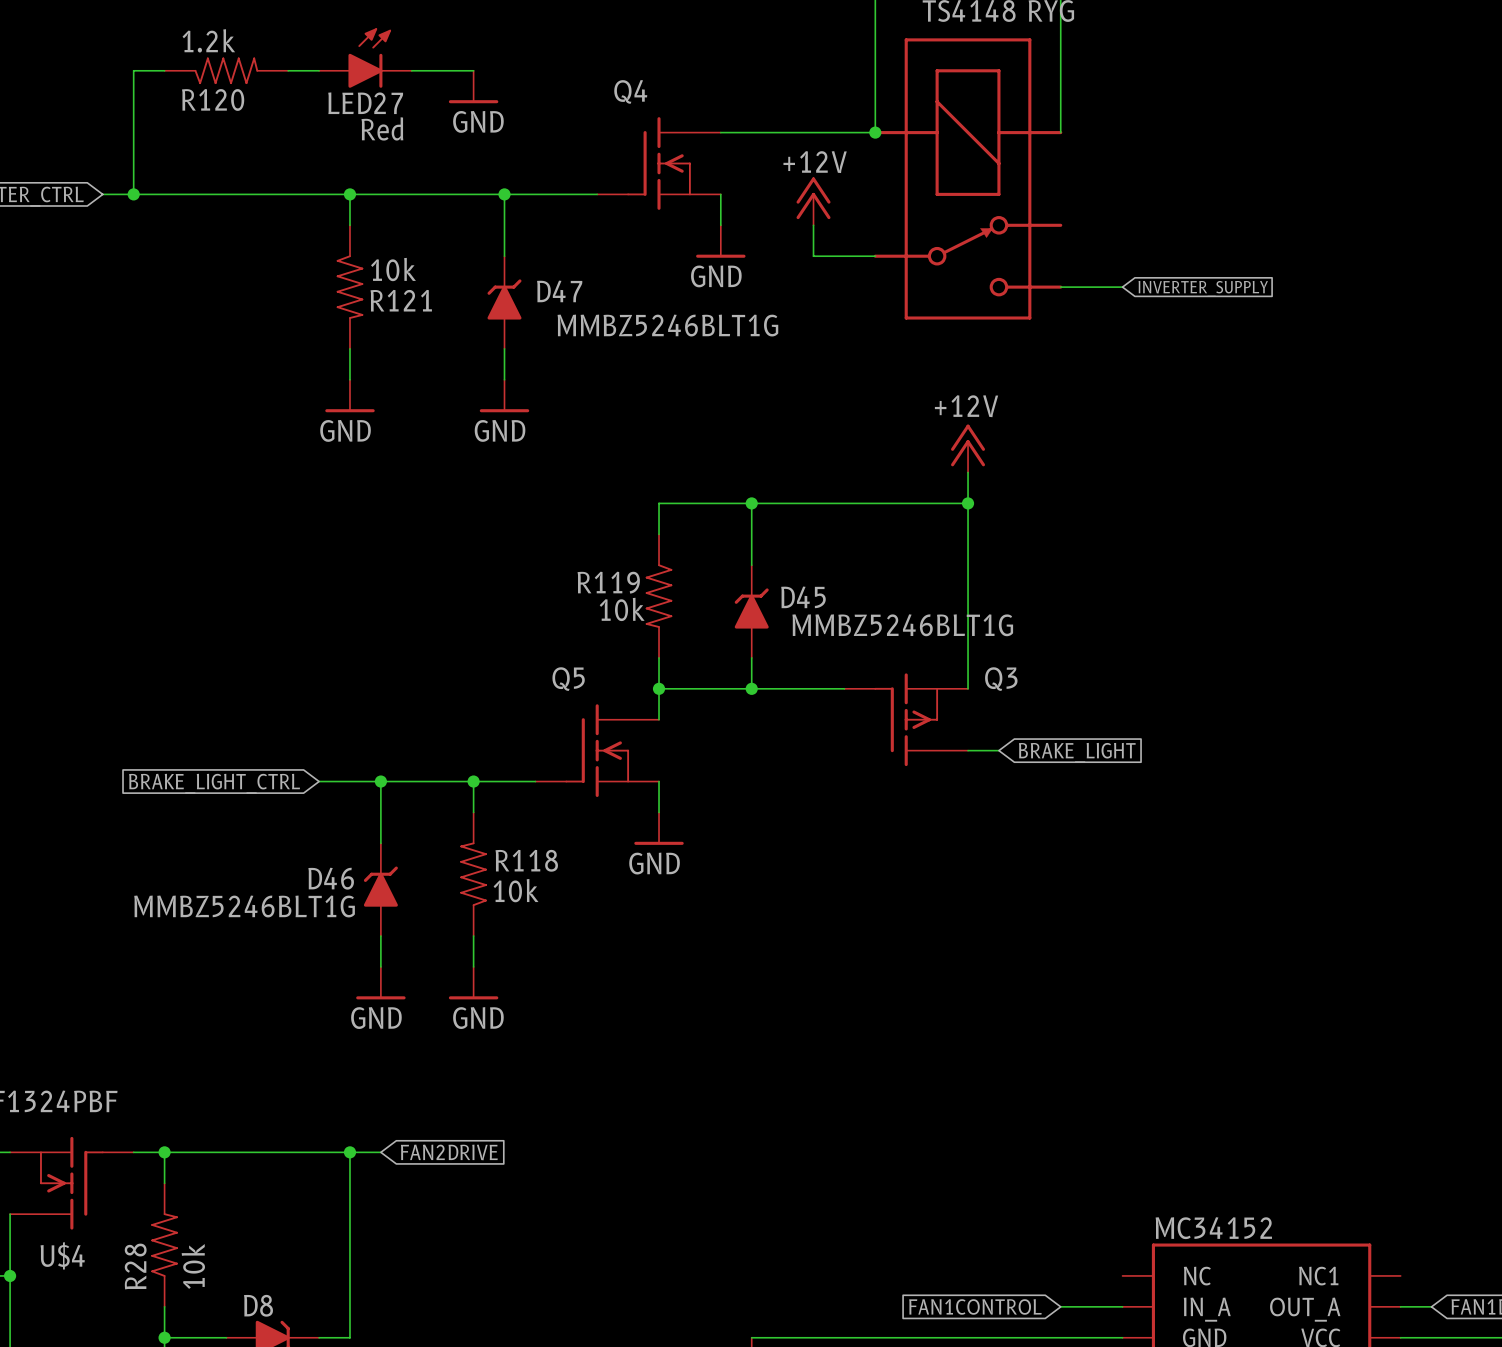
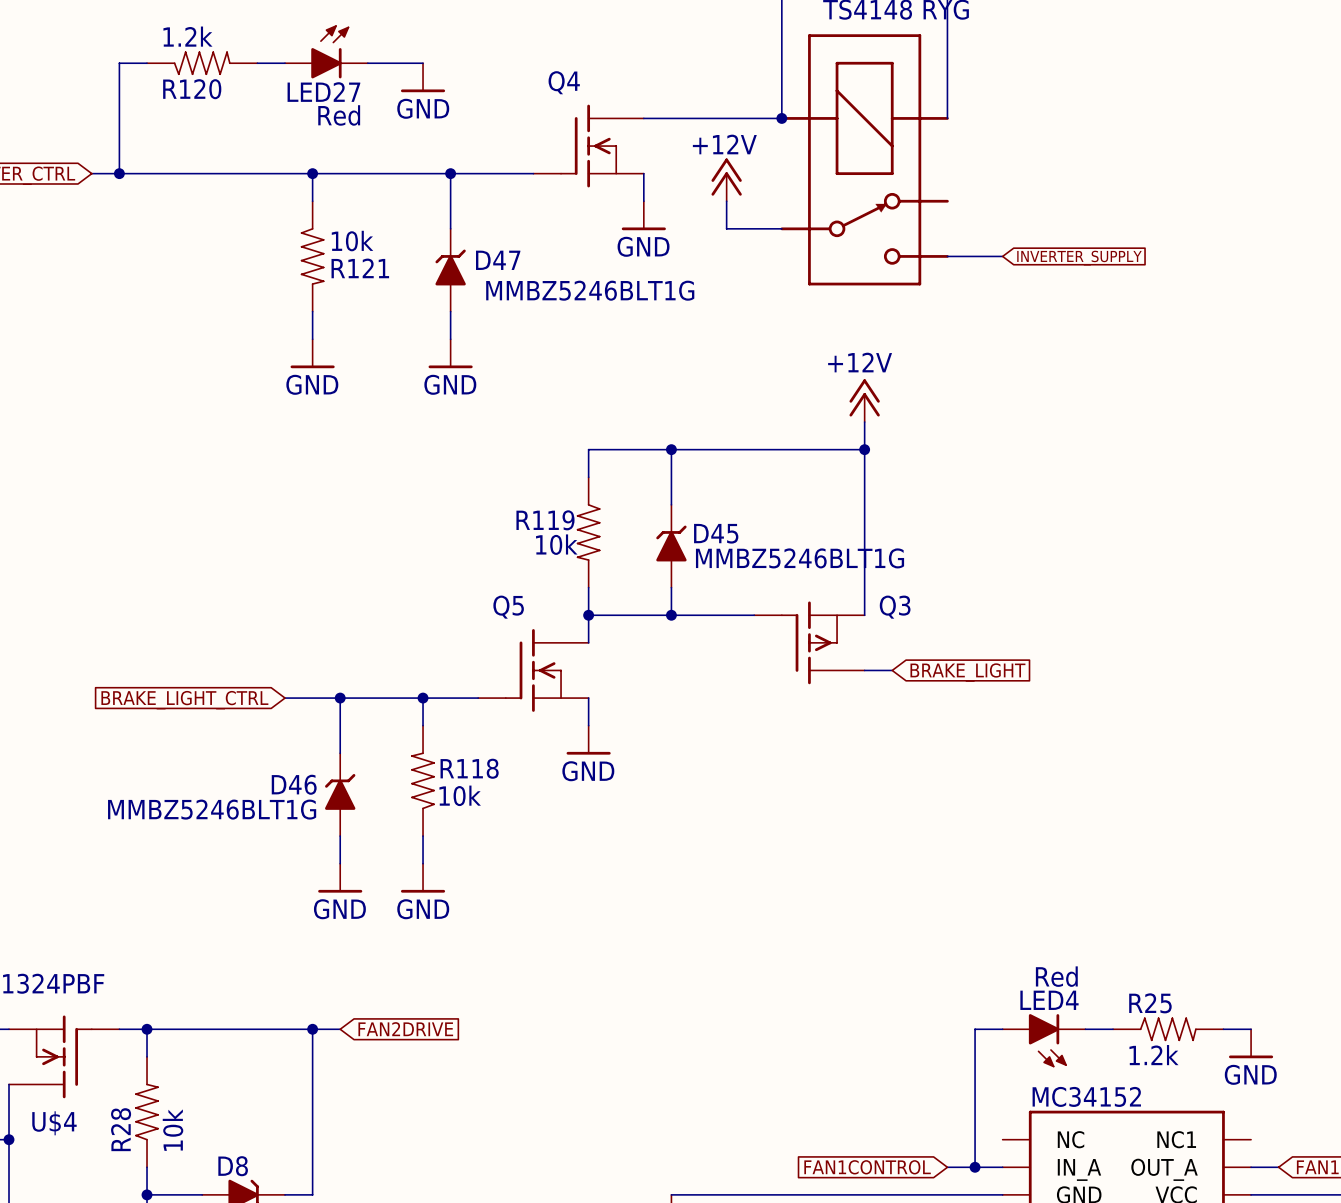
wire: none -> (1002, 1029) (975, 1029) (975, 1167)
wire: none -> (1085, 1029) (1113, 1029)
R25: none -> 1.2k (1168, 1029)
wire: none -> (1223, 1029) (1251, 1029)
LED4: none -> Red (1044, 1040)
power symbol: none -> GND (1251, 1043)
junction: none -> (975, 1167)

